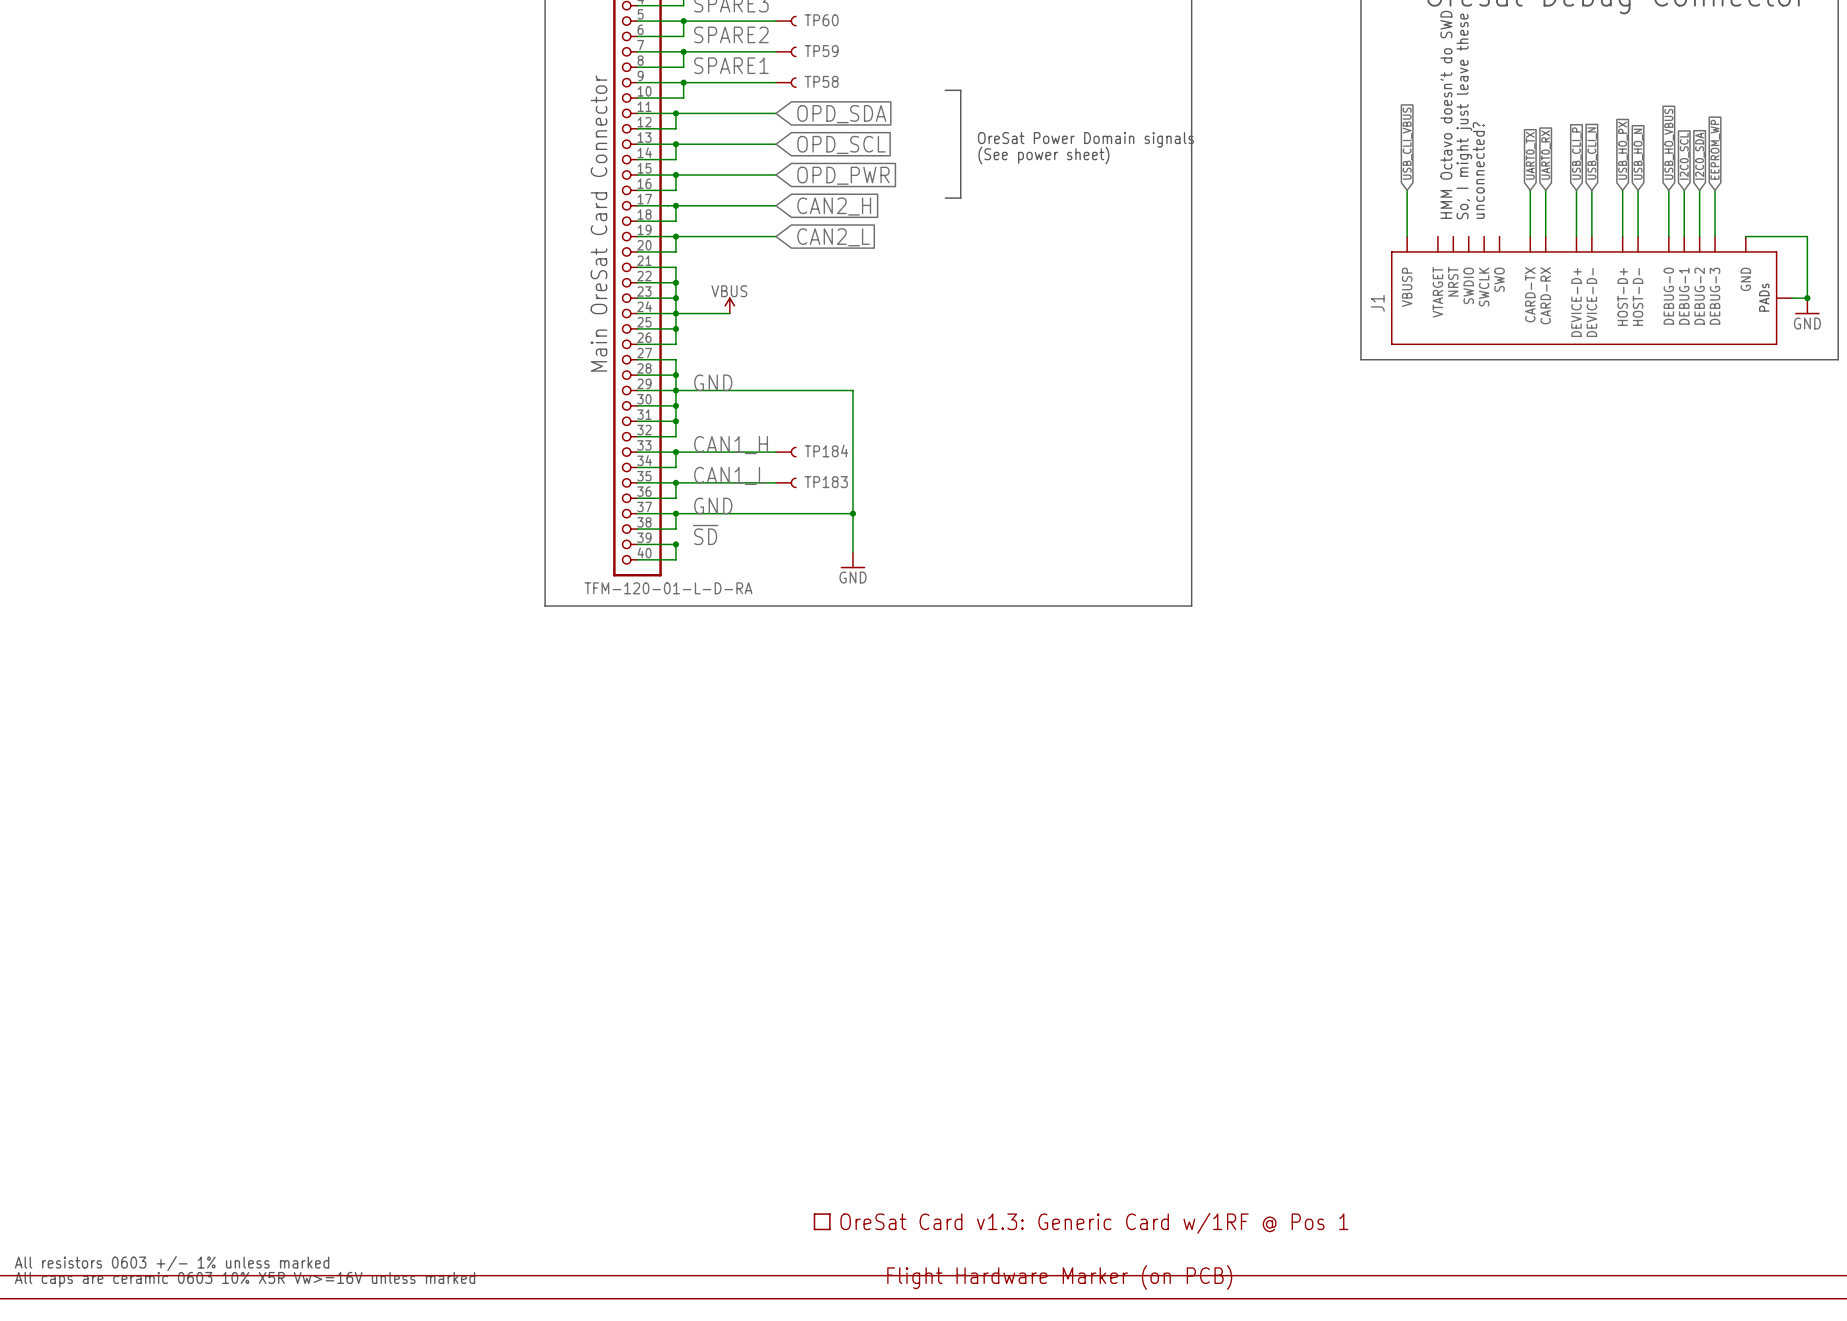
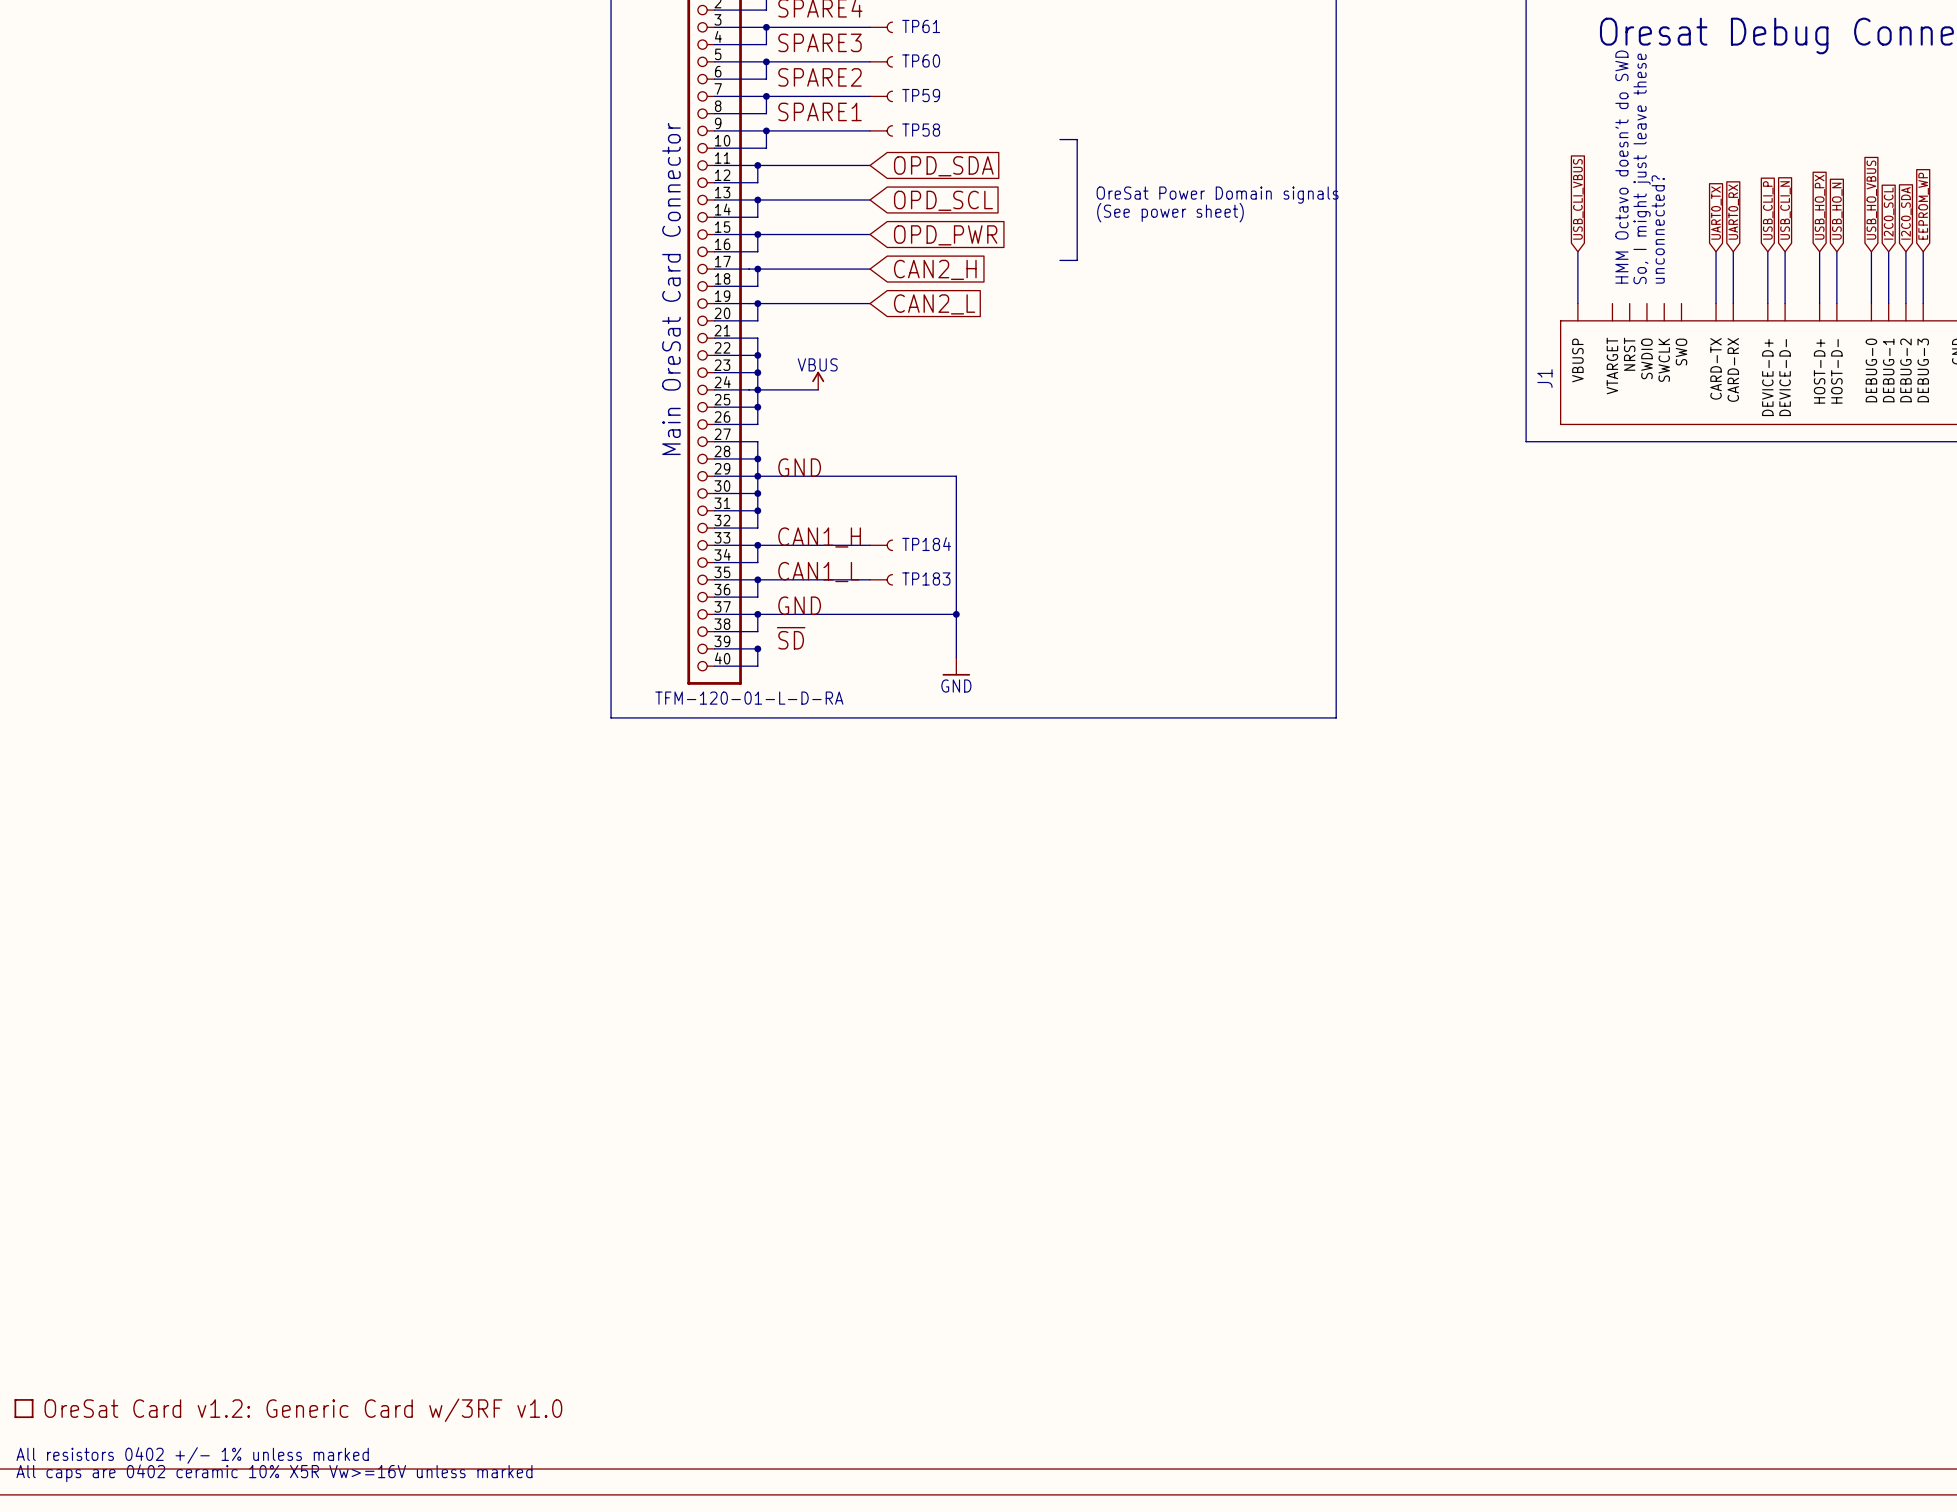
part: none -> (24, 1408)
part: (822, 1221) -> none
text: All resistors 0603 +/- 1% unless marked (172, 1263) -> All resistors 0402 +/- 1% unless marked (192, 1455)
part: (1059, 1277) -> none
text: All caps are ceramic 0603 10% X5R Vw>=16V unless marked (245, 1279) -> All caps are 0402 ceramic 10% X5R Vw>=16V unless marked (274, 1473)

